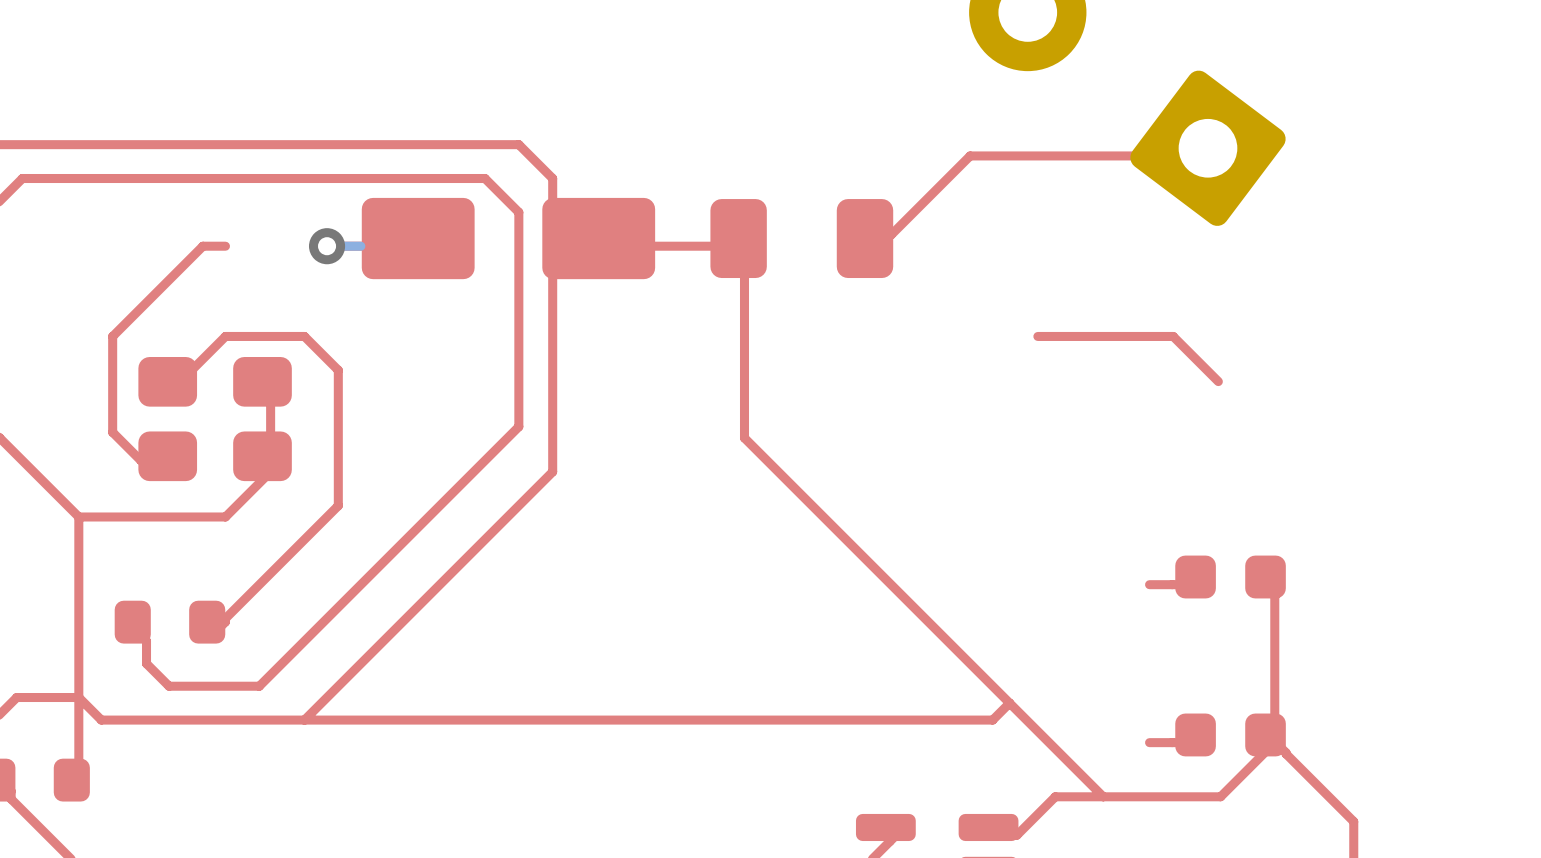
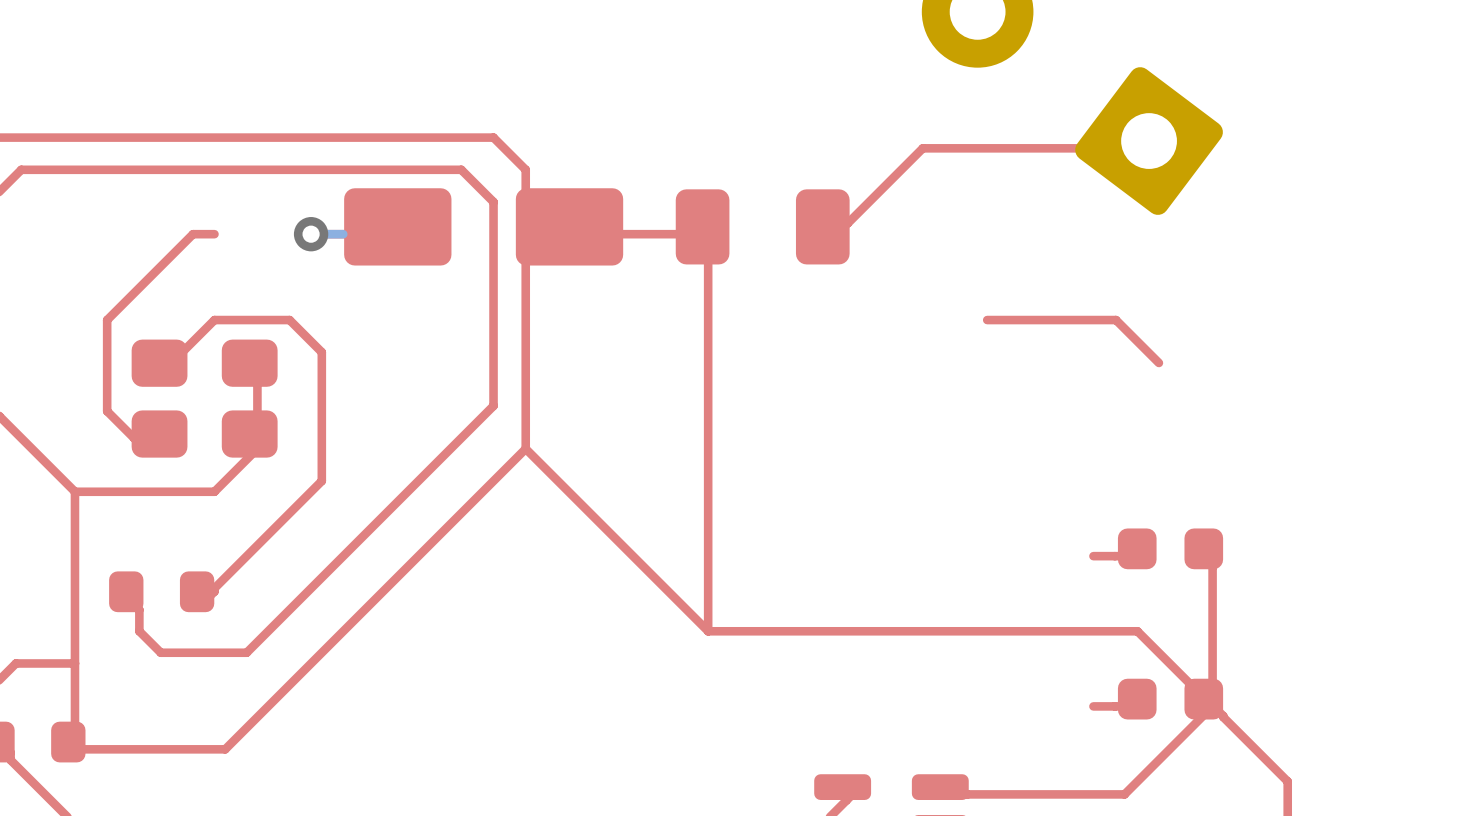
top track: (744, 438) (1103, 796) -> (708, 416) (708, 631)
top track: none -> (525, 448) (708, 631)
top track: none -> (708, 631) (1137, 631) (1201, 695)
top track: (78, 697) (101, 720) (992, 720) (1009, 703) -> none
top track: none -> (289, 684) (225, 749) (78, 749)
top track: (1220, 796) (1055, 796) (1016, 835) -> (1161, 757) (1124, 794) (967, 794)

